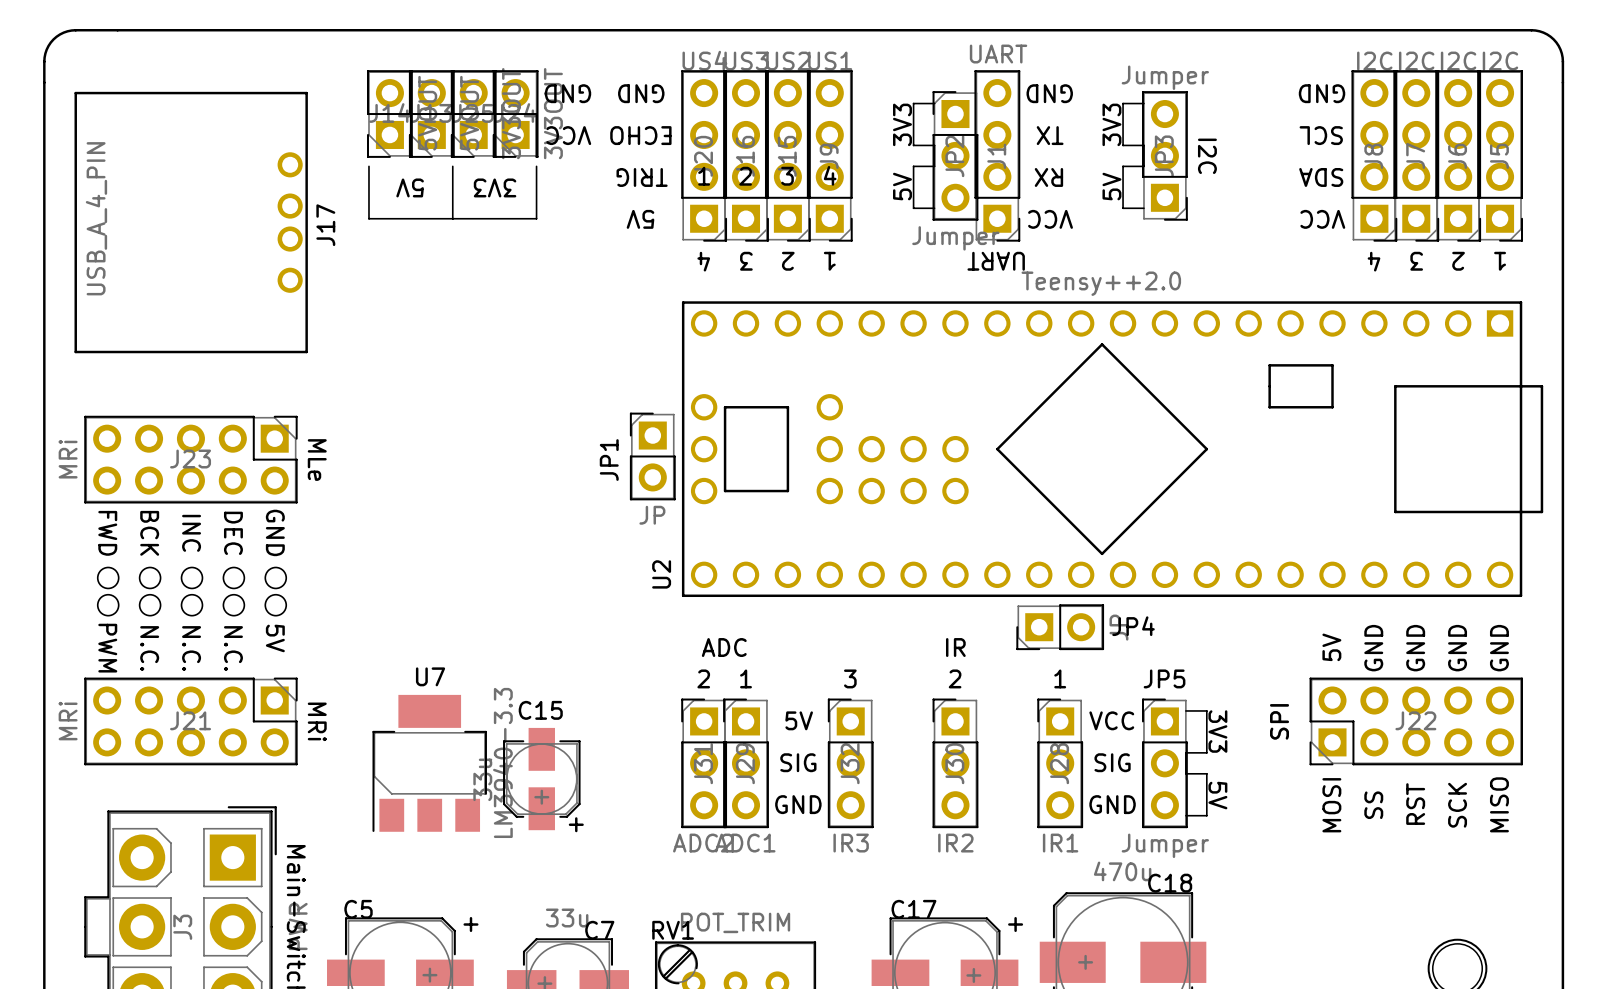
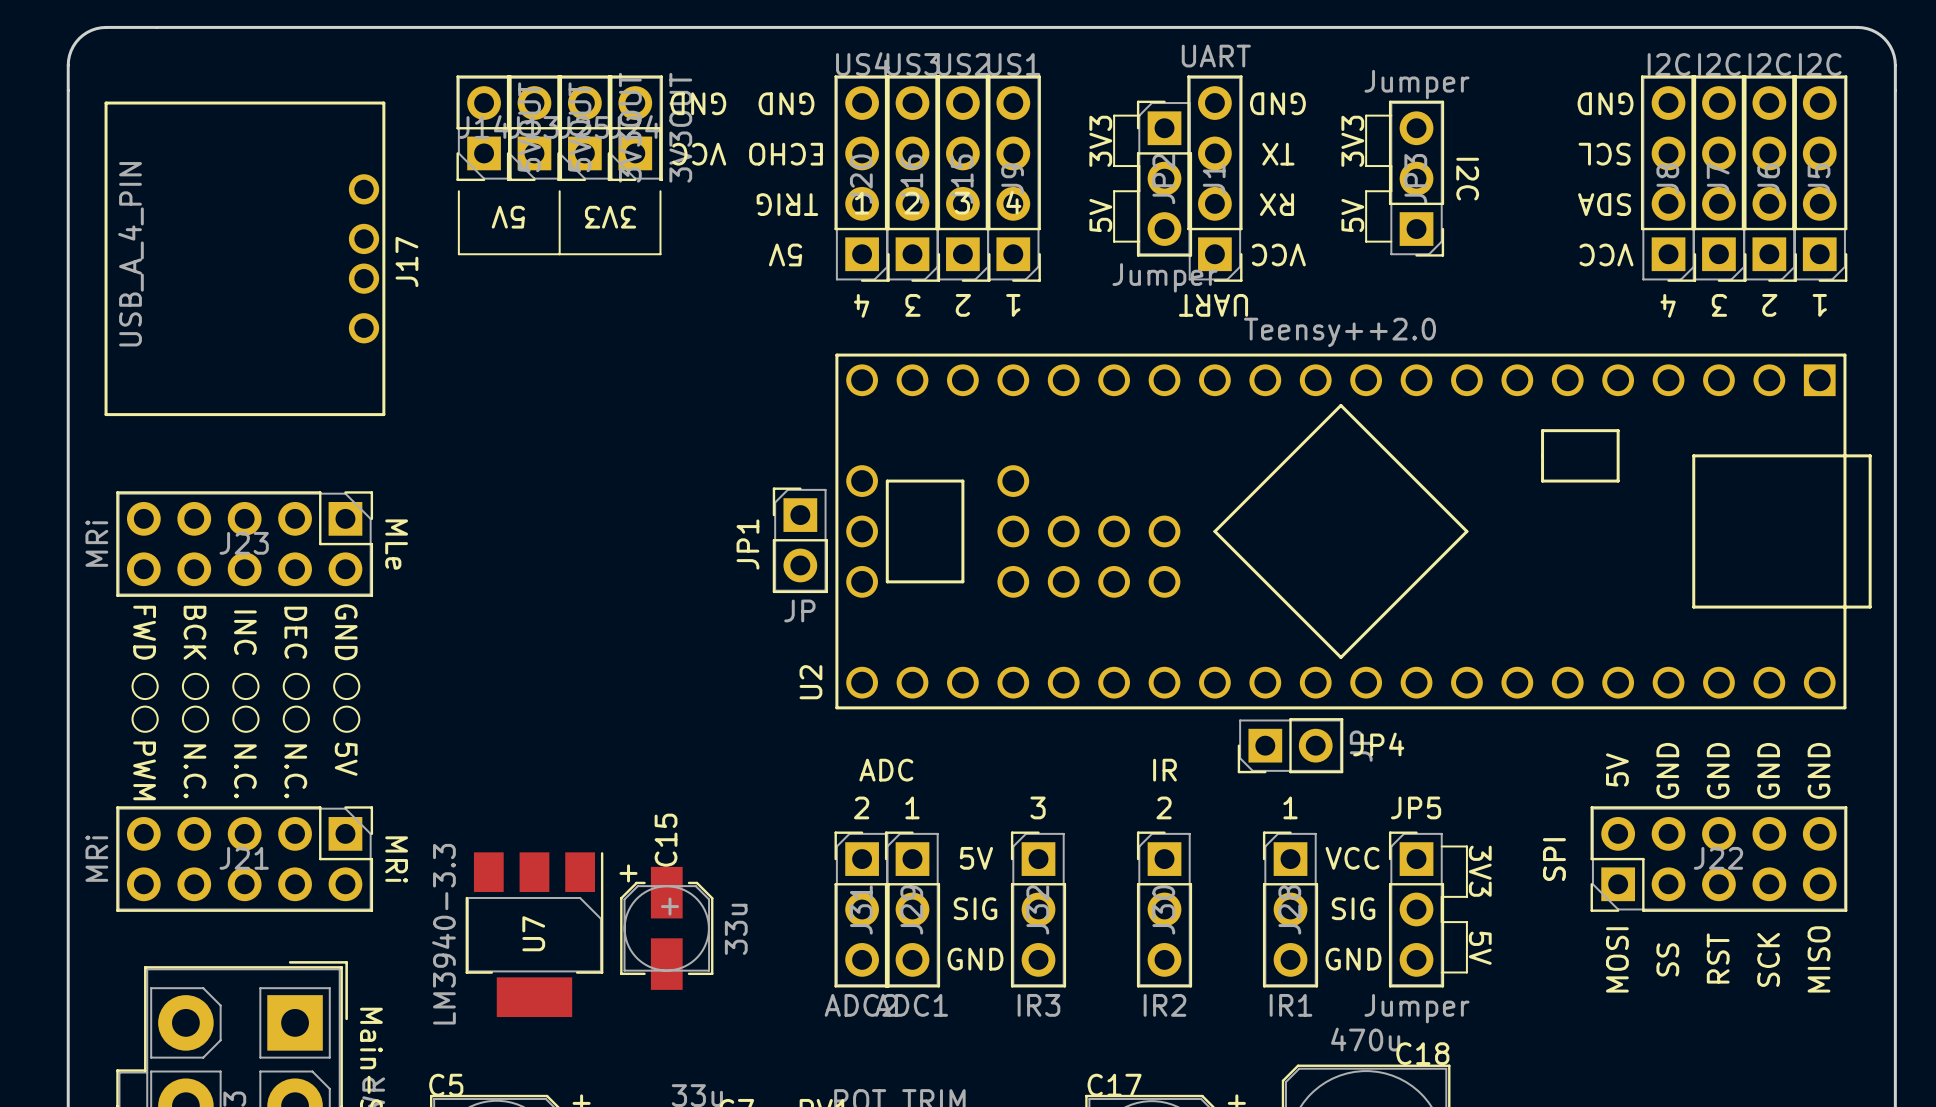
U7 name position: U7 (430, 676) -> U7 (533, 933)
U7 rotation: 0° (429, 763) -> 180° (534, 934)
C15 rotation: 0° (541, 779) -> 180° (666, 928)

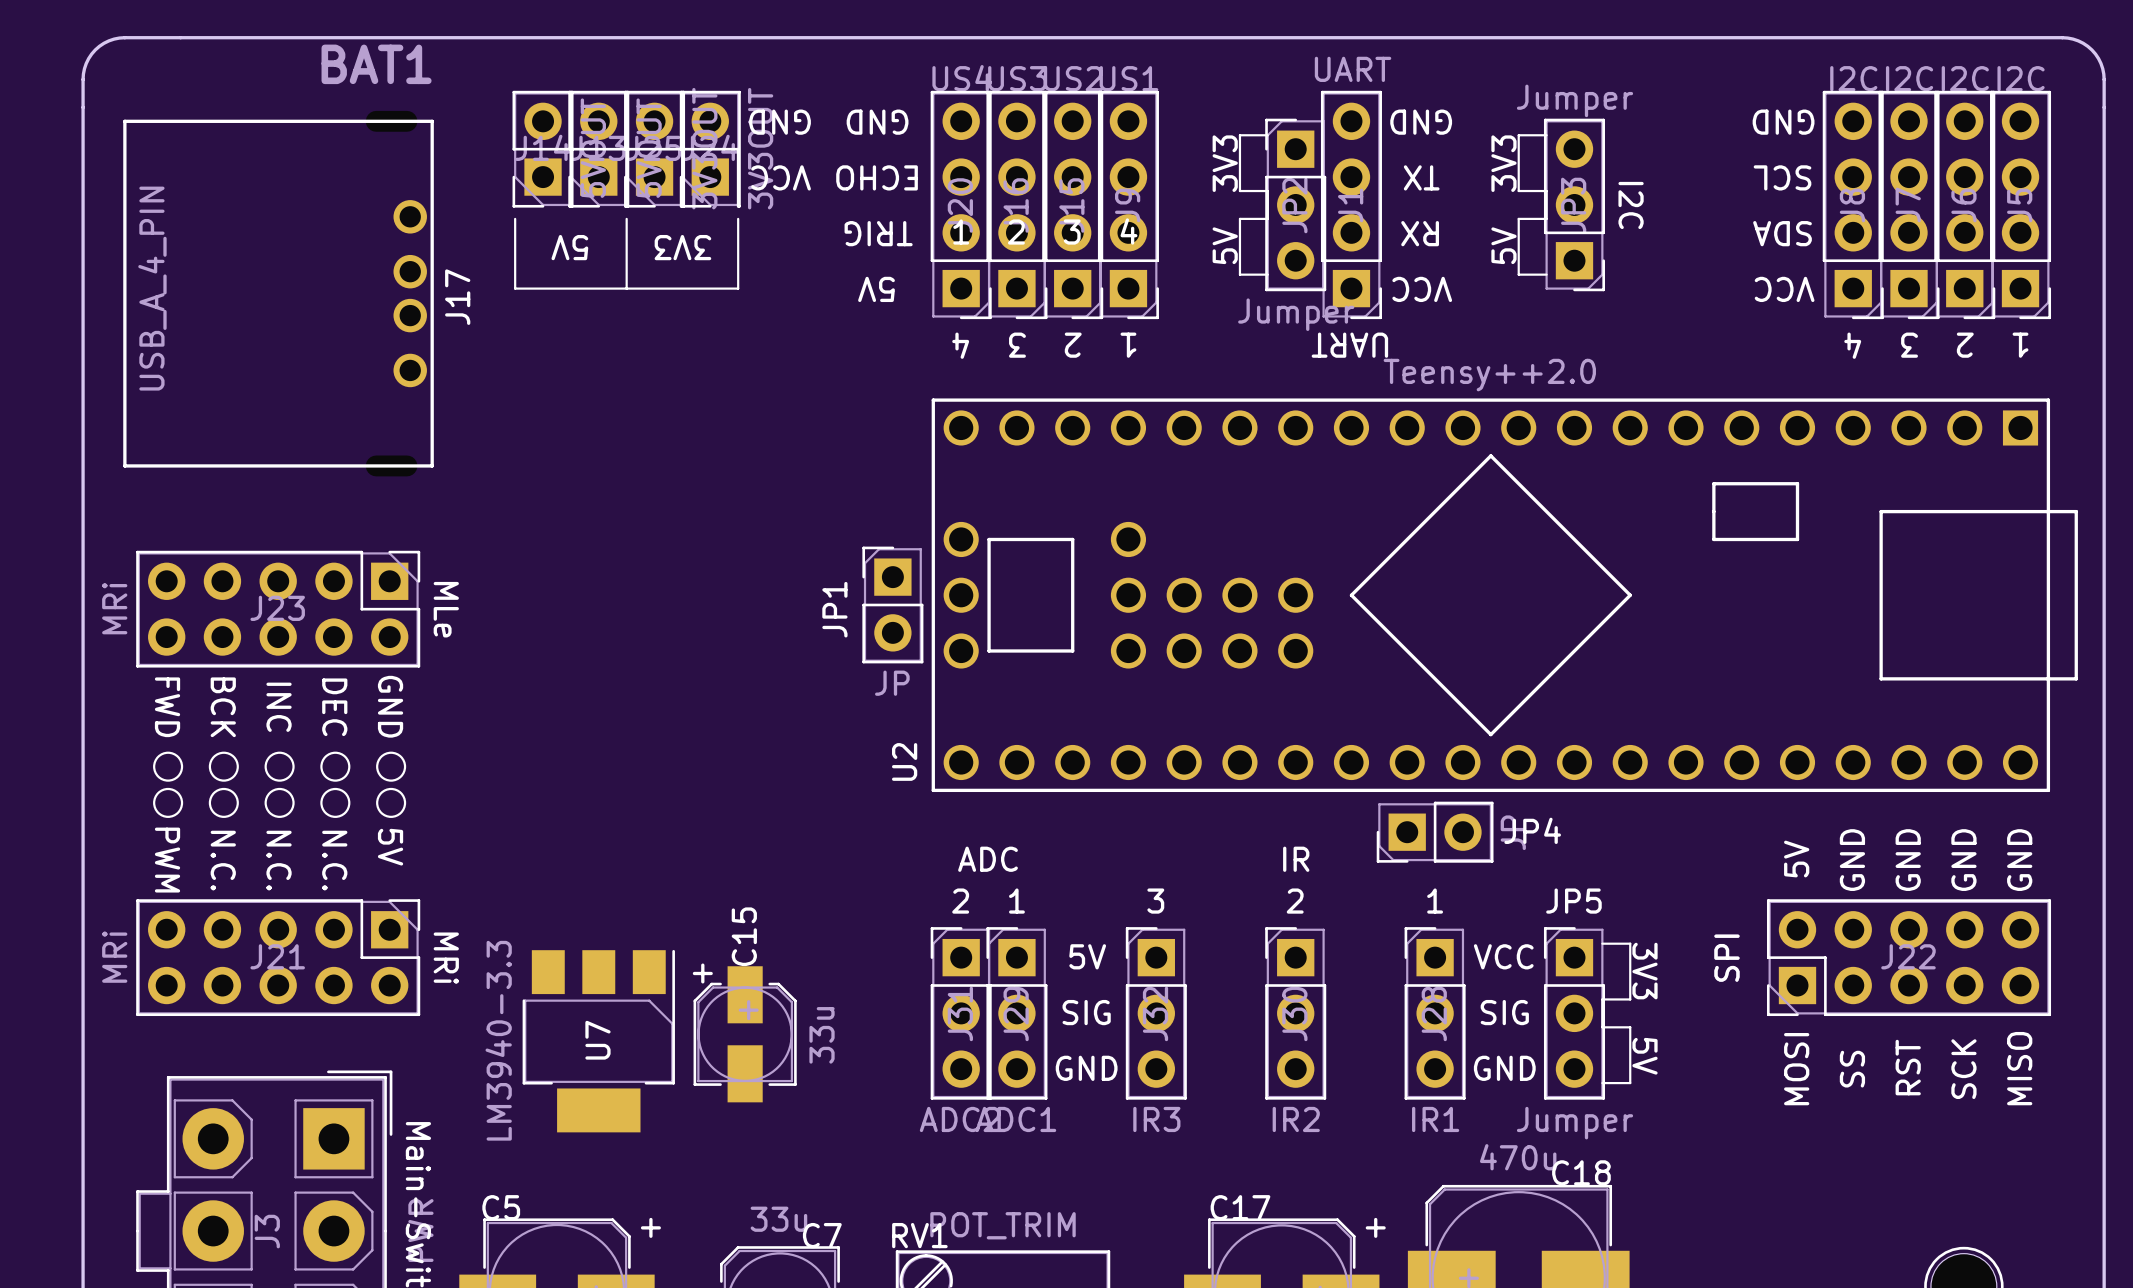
text: none -> BAT1 (376, 64)

